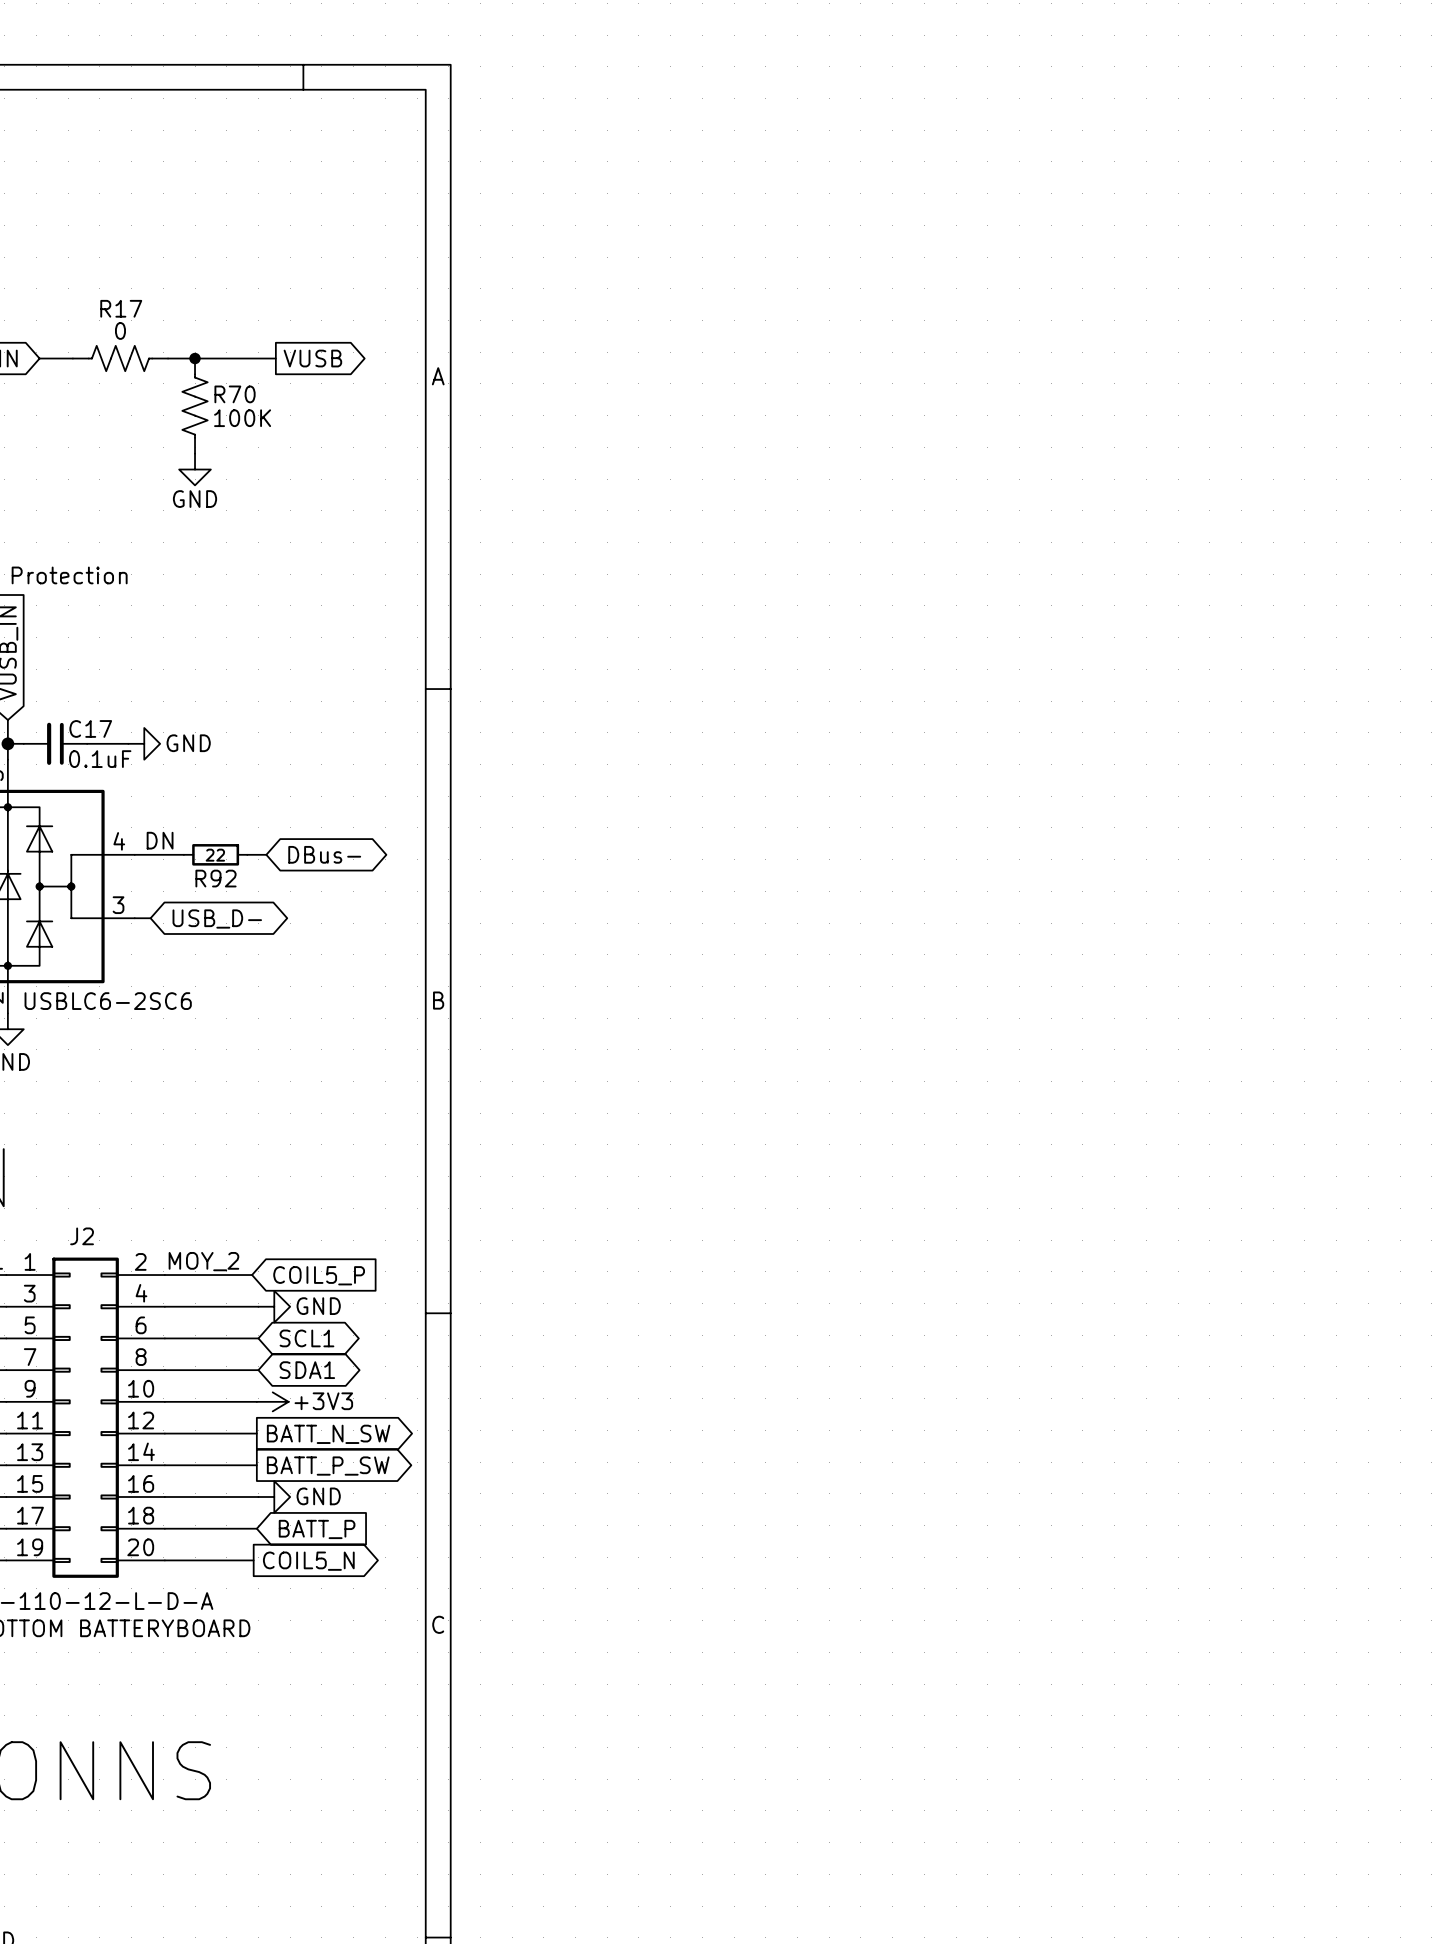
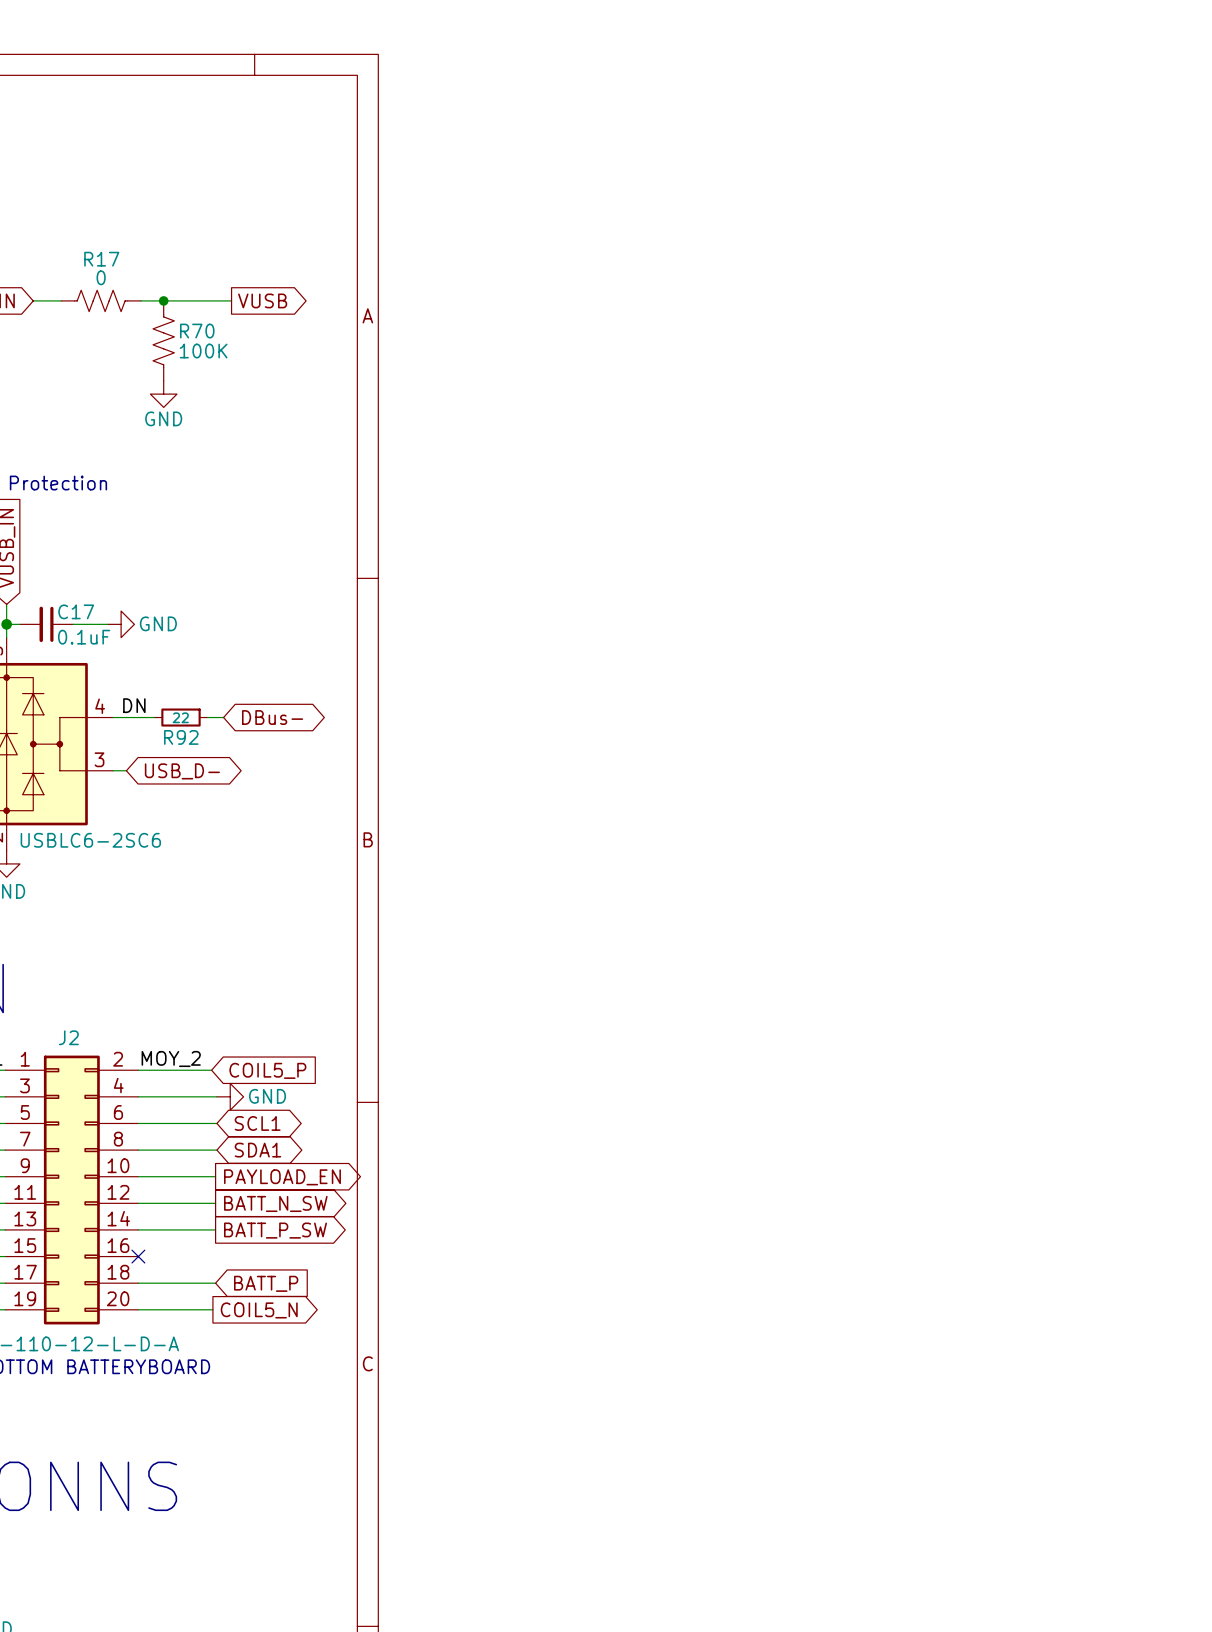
power symbol: +3V3 (272, 1401) -> none
global label: none -> PAYLOAD_EN (282, 1177)
wire: (164, 1497) (258, 1497) -> none
no-connect mark: none -> (138, 1256)
power symbol: GND (274, 1497) -> none

